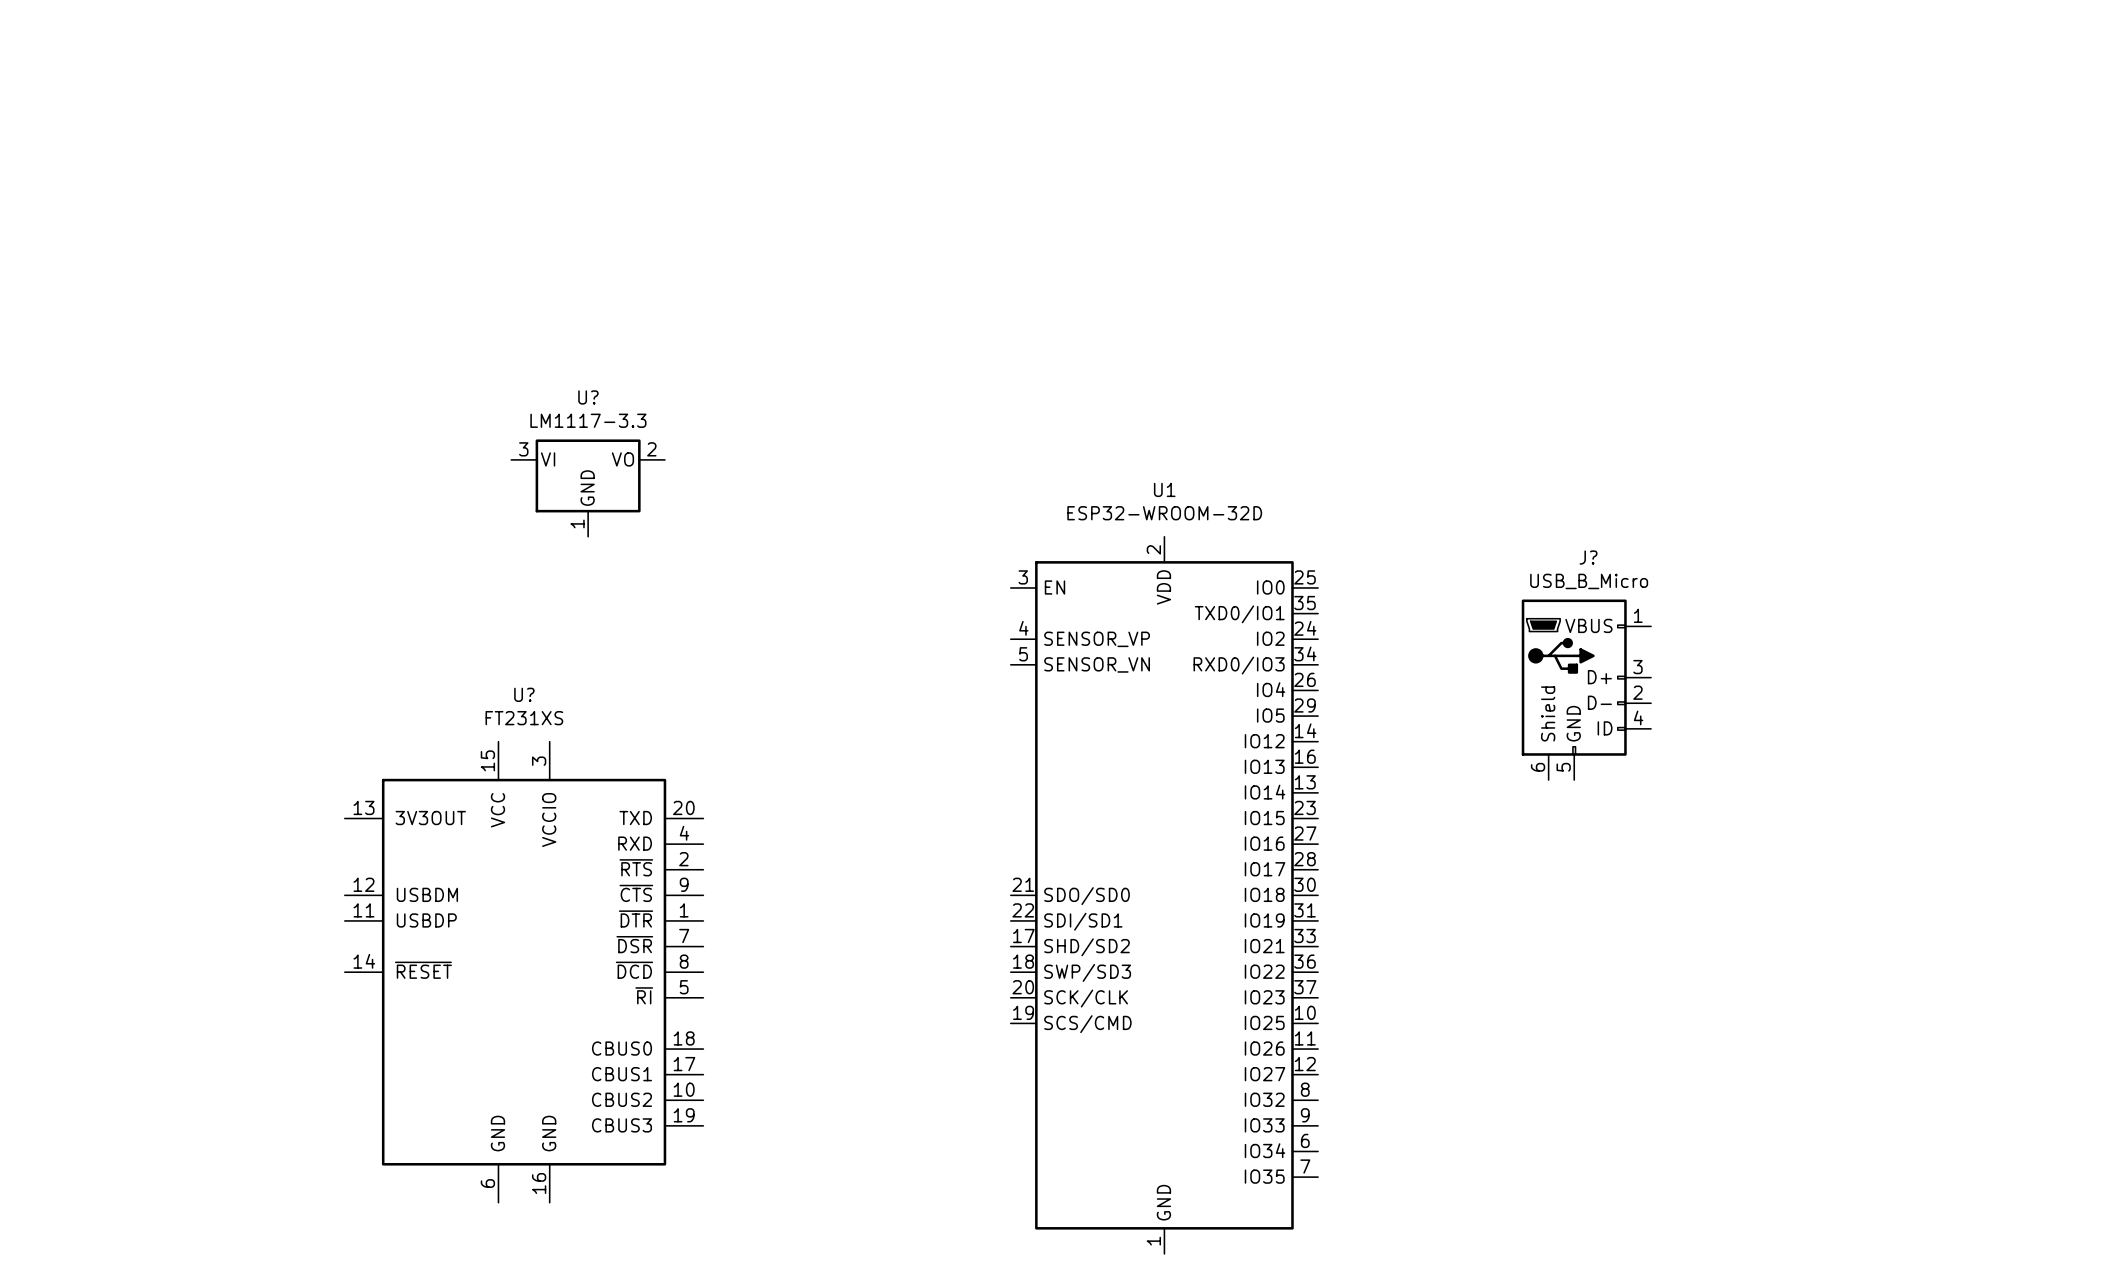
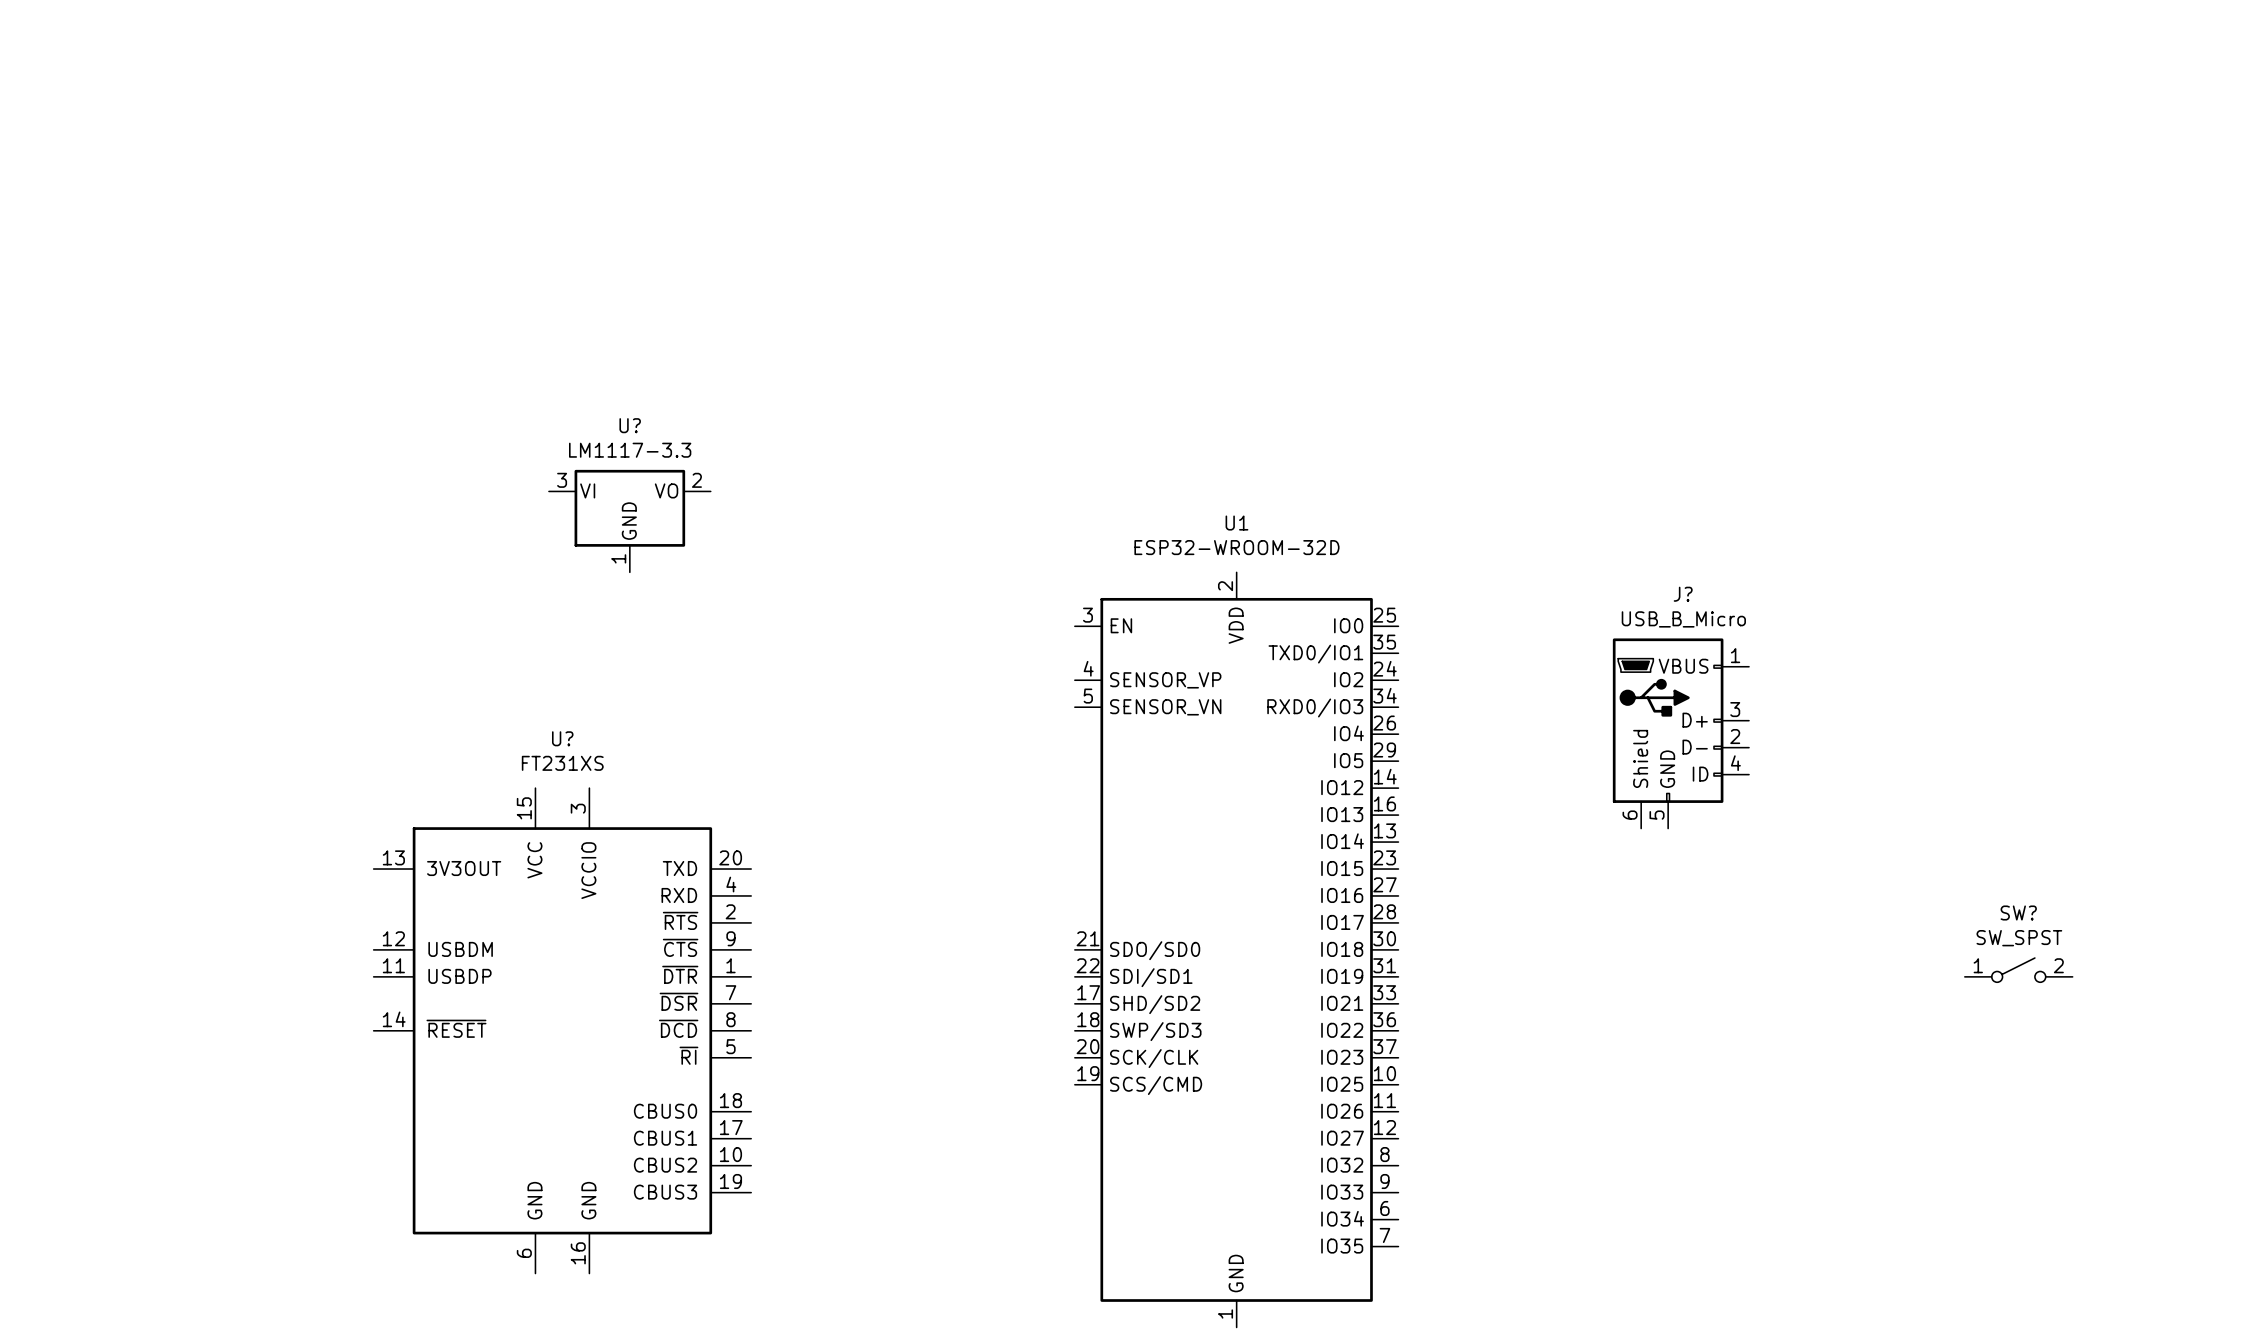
SW?: none -> SW_SPST (2018, 970)

